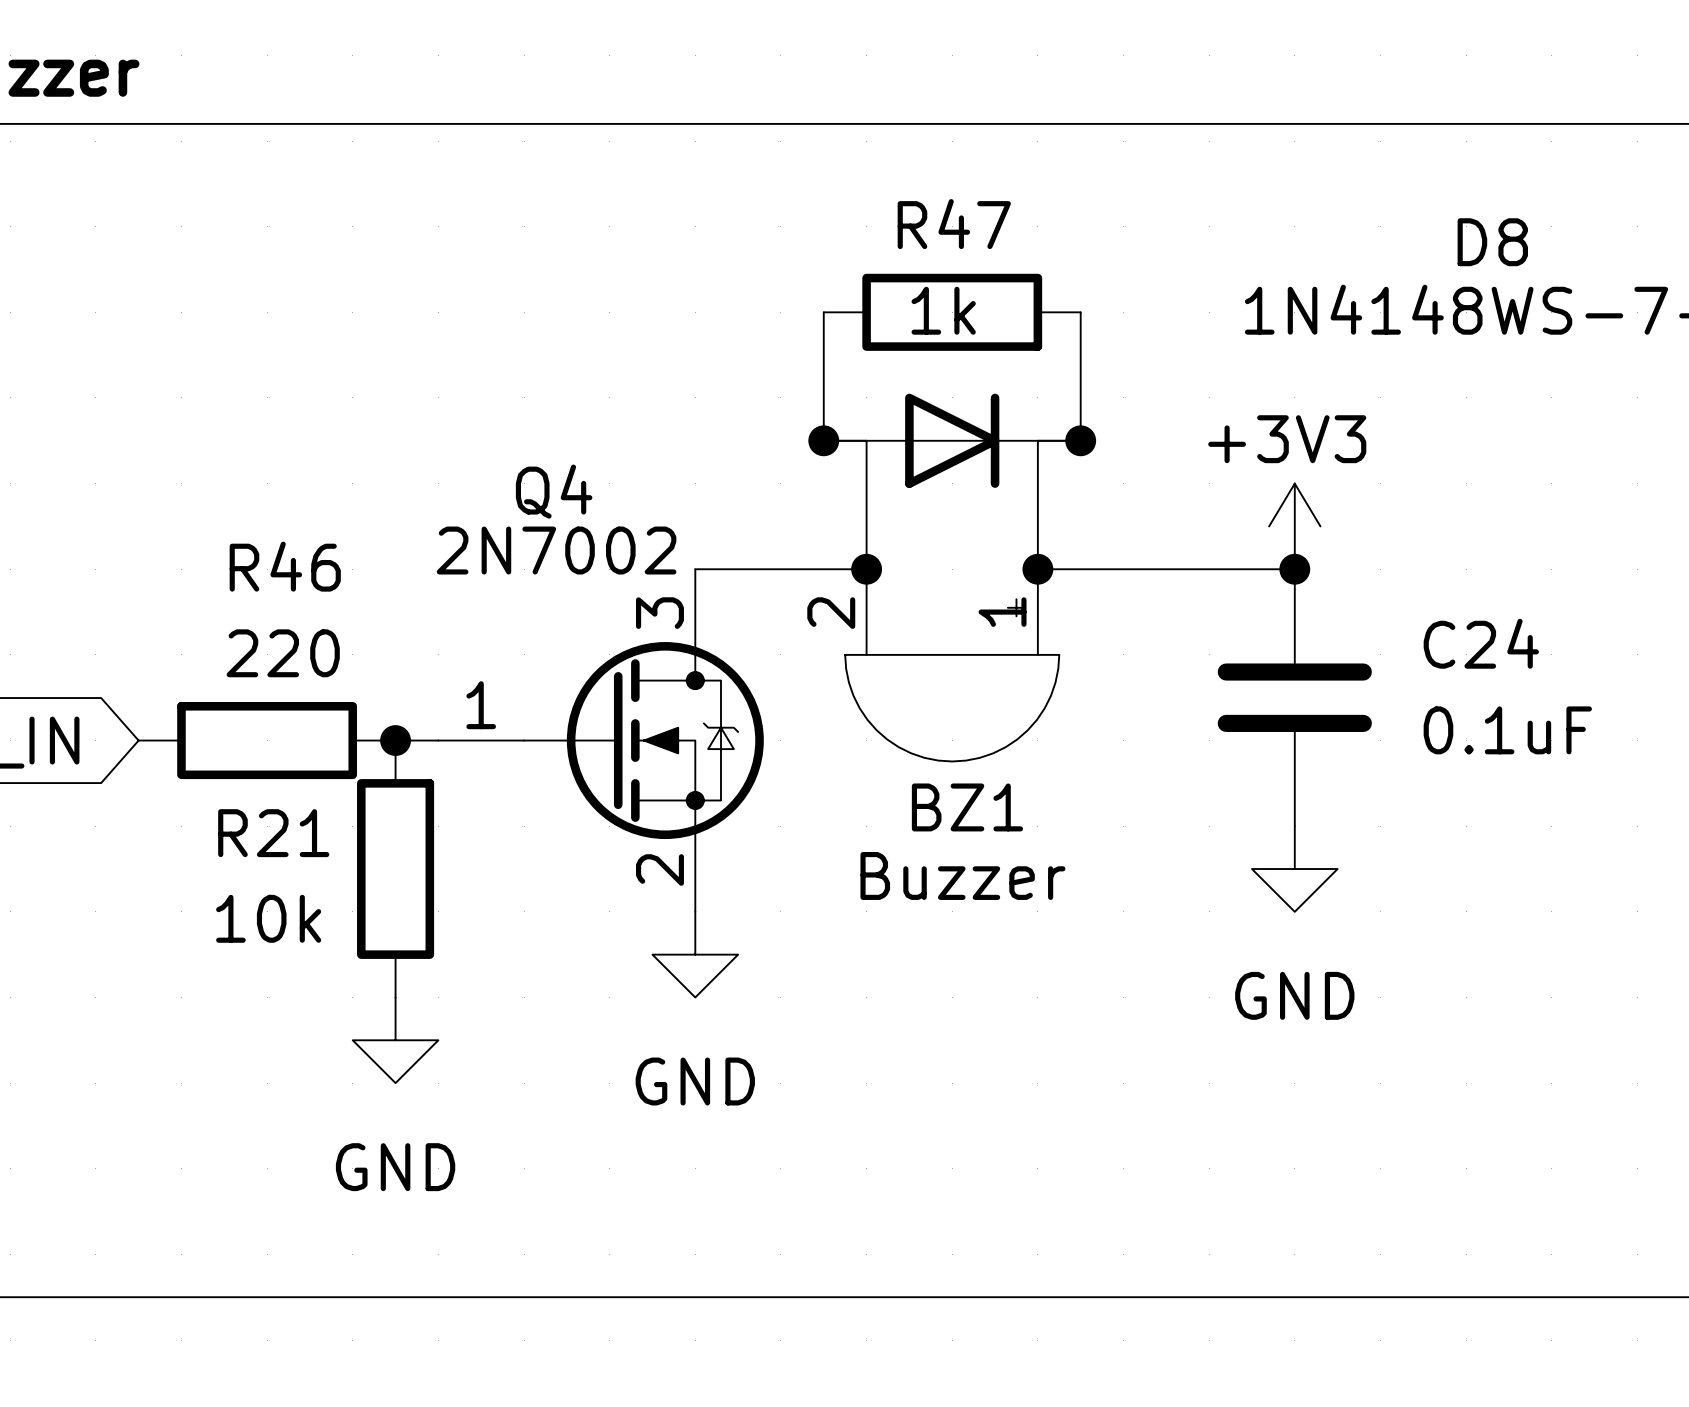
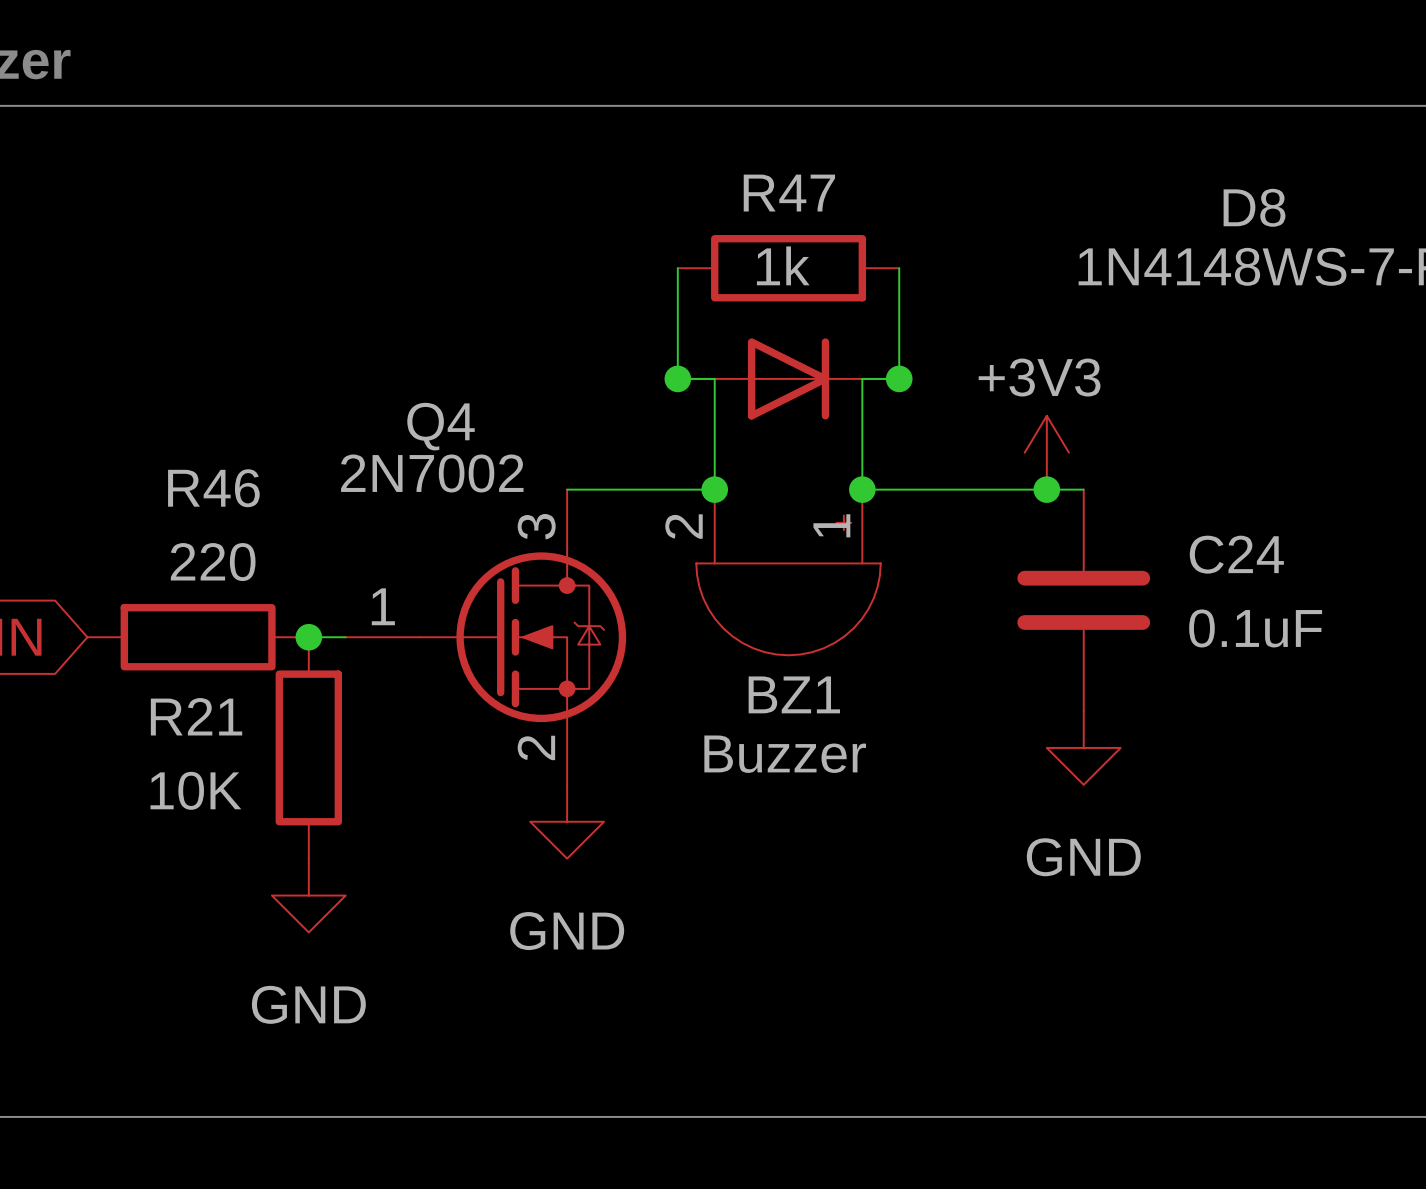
power symbol position: +3V3 (1294, 526) -> +3V3 (1046, 452)
junction position: (1294, 569) -> (1046, 489)
R21 value: 10k (268, 918) -> 10K (195, 790)

